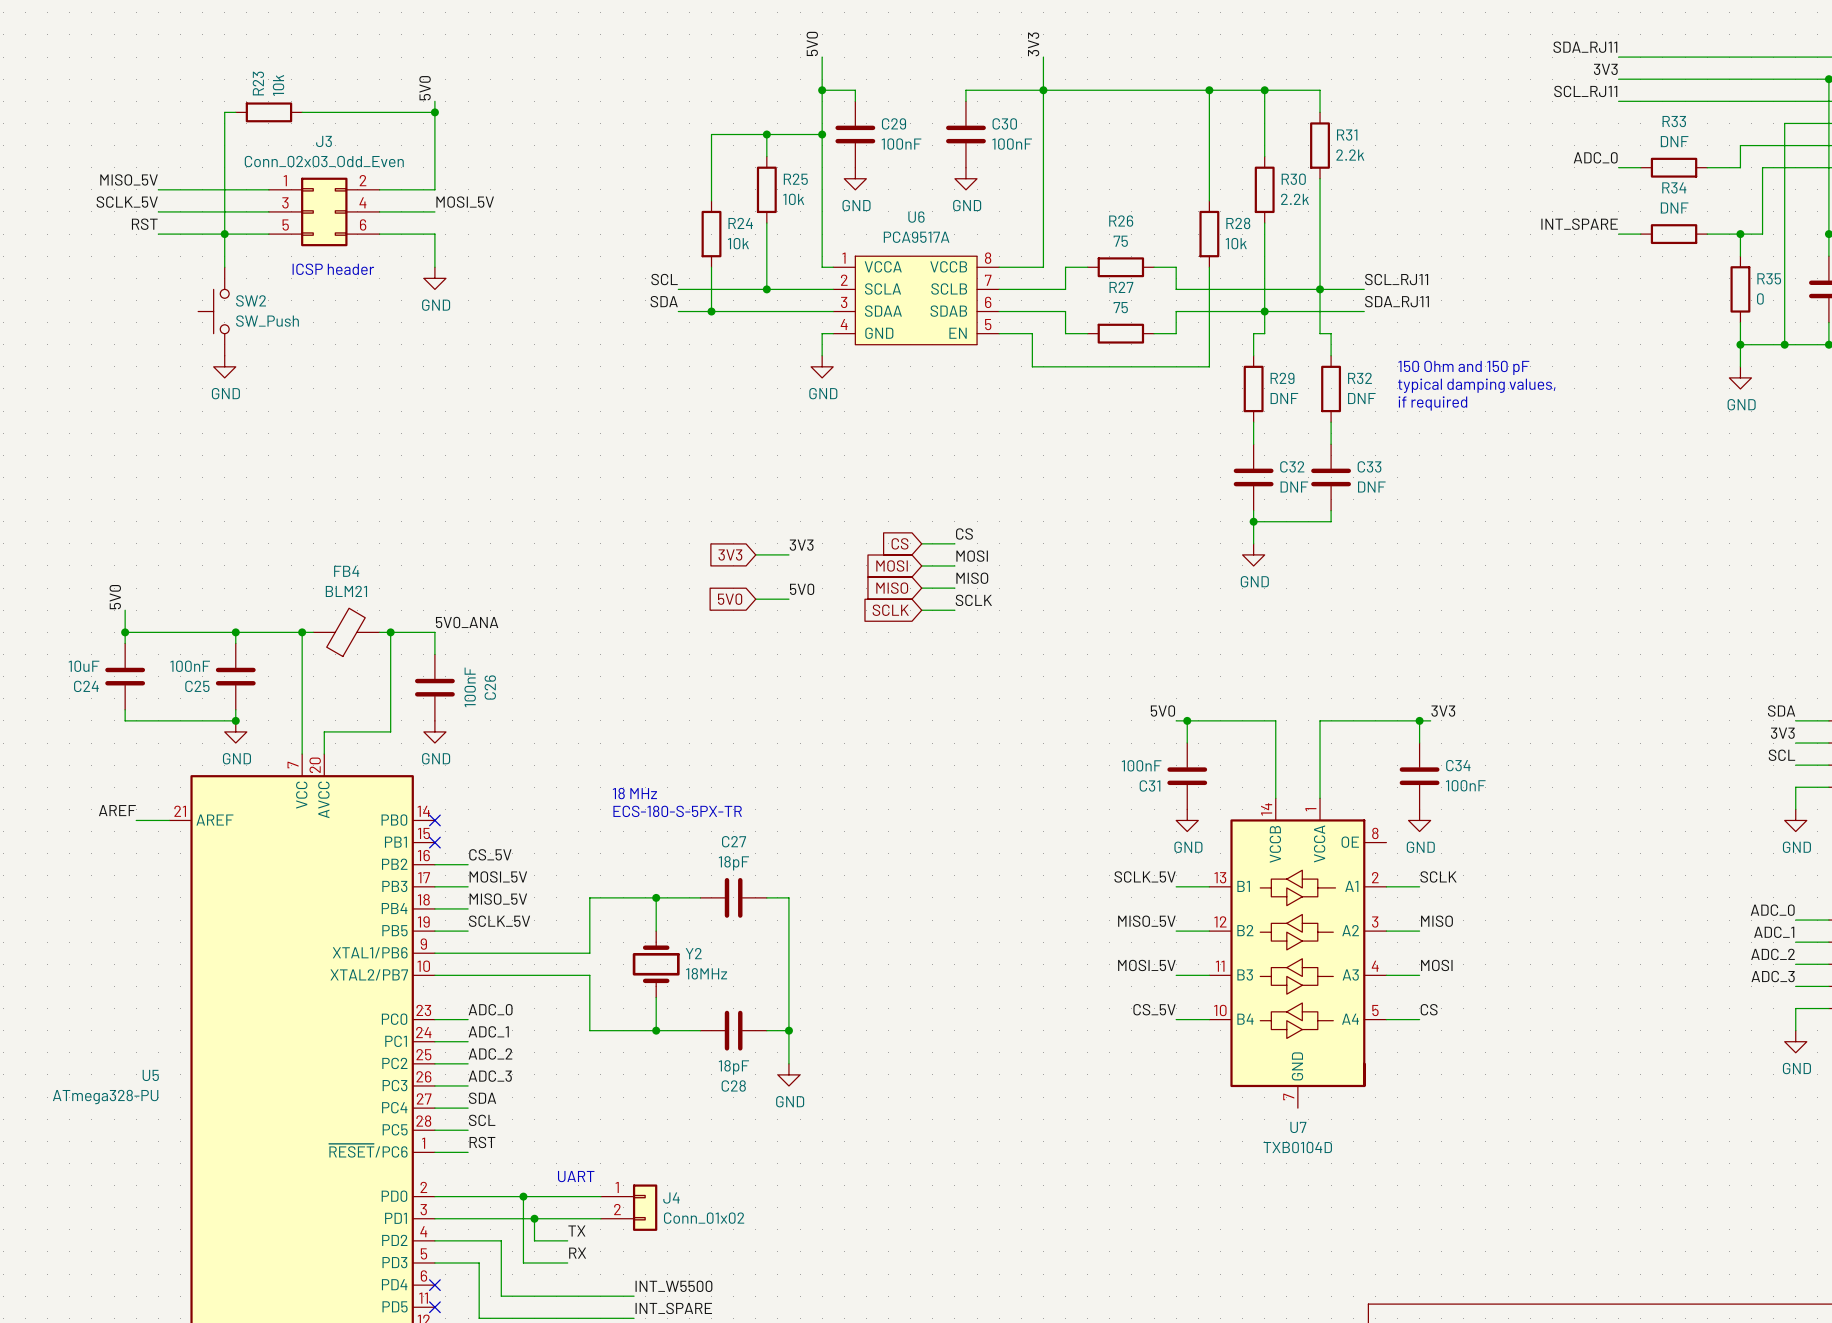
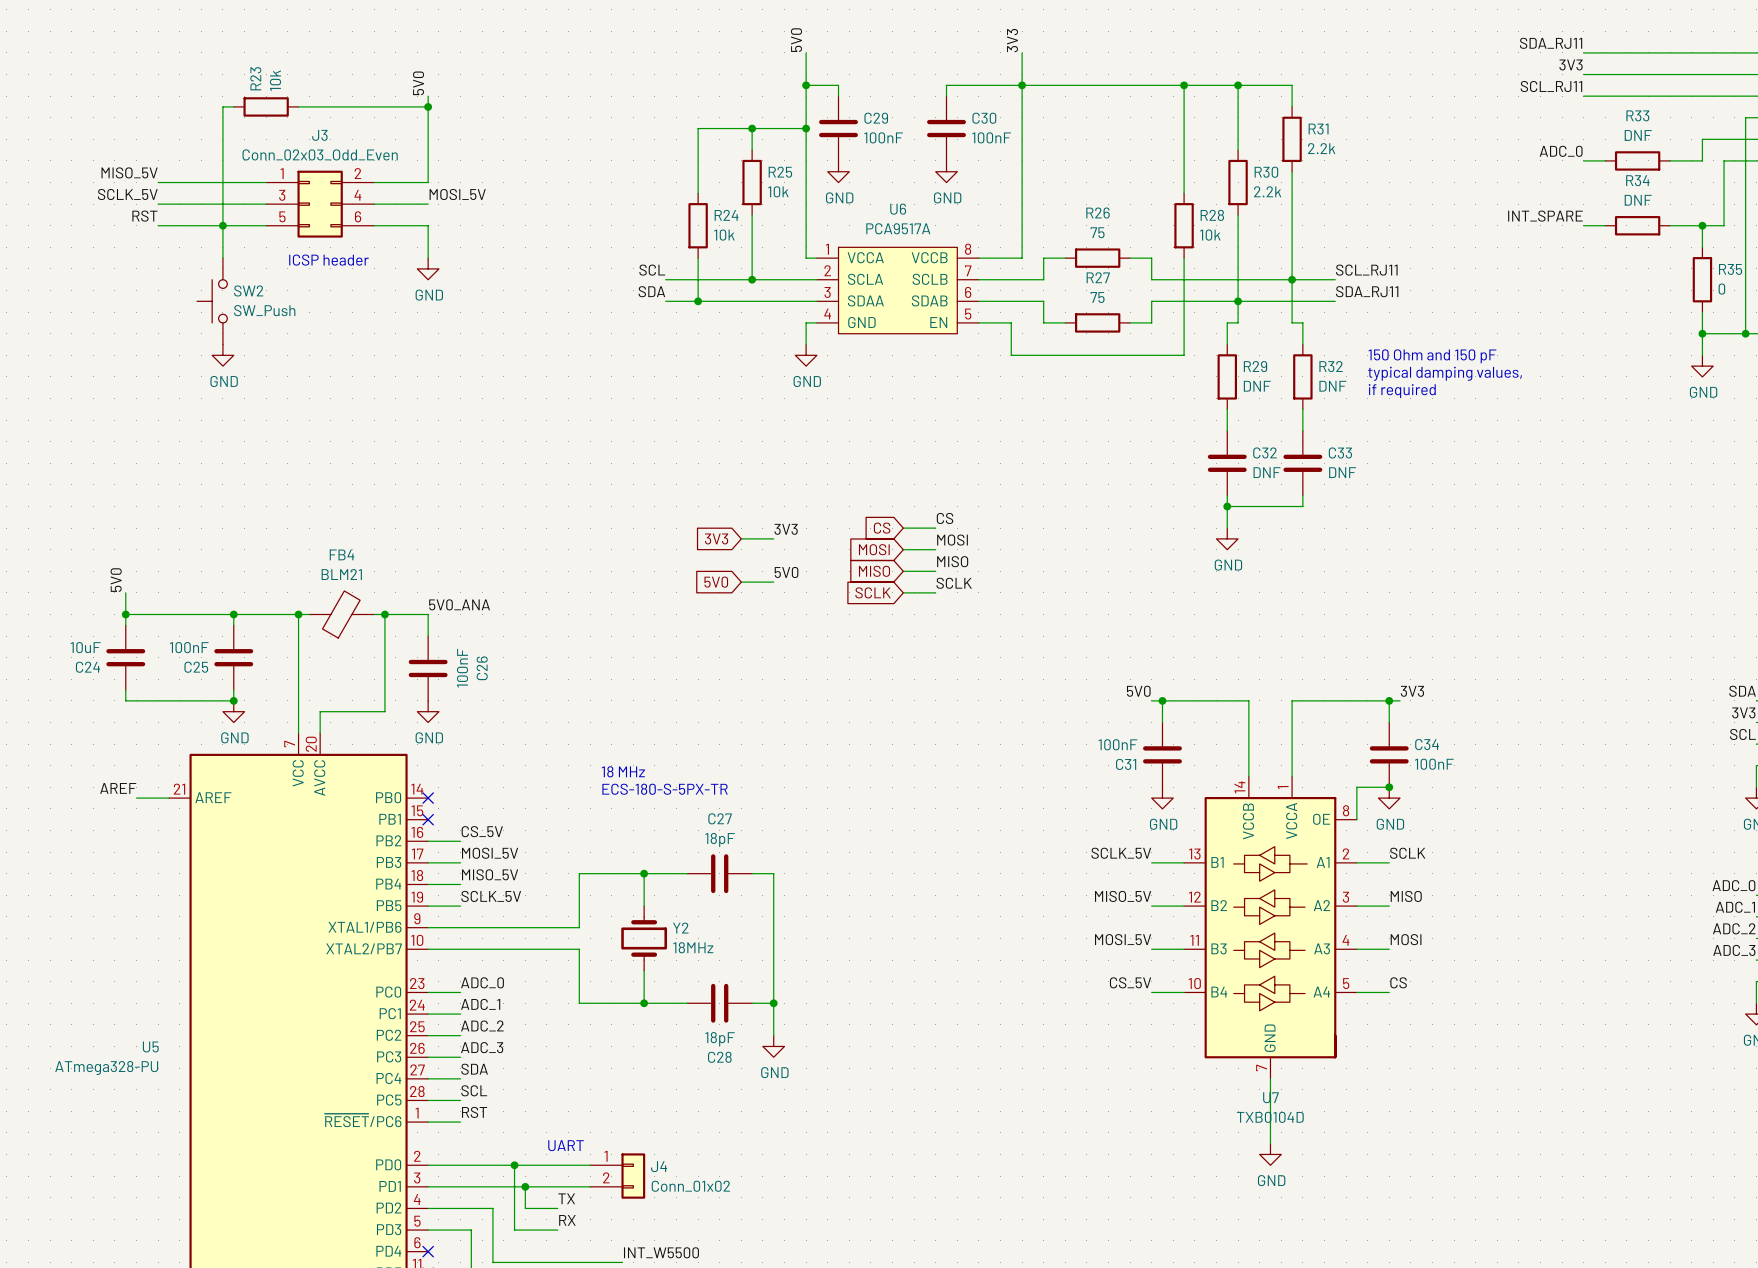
wire: none -> (1389, 787) (1356, 787) (1356, 819)
junction: none -> (1389, 787)
wire: none -> (1270, 1078) (1270, 1143)
power symbol: none -> GND (1270, 1154)

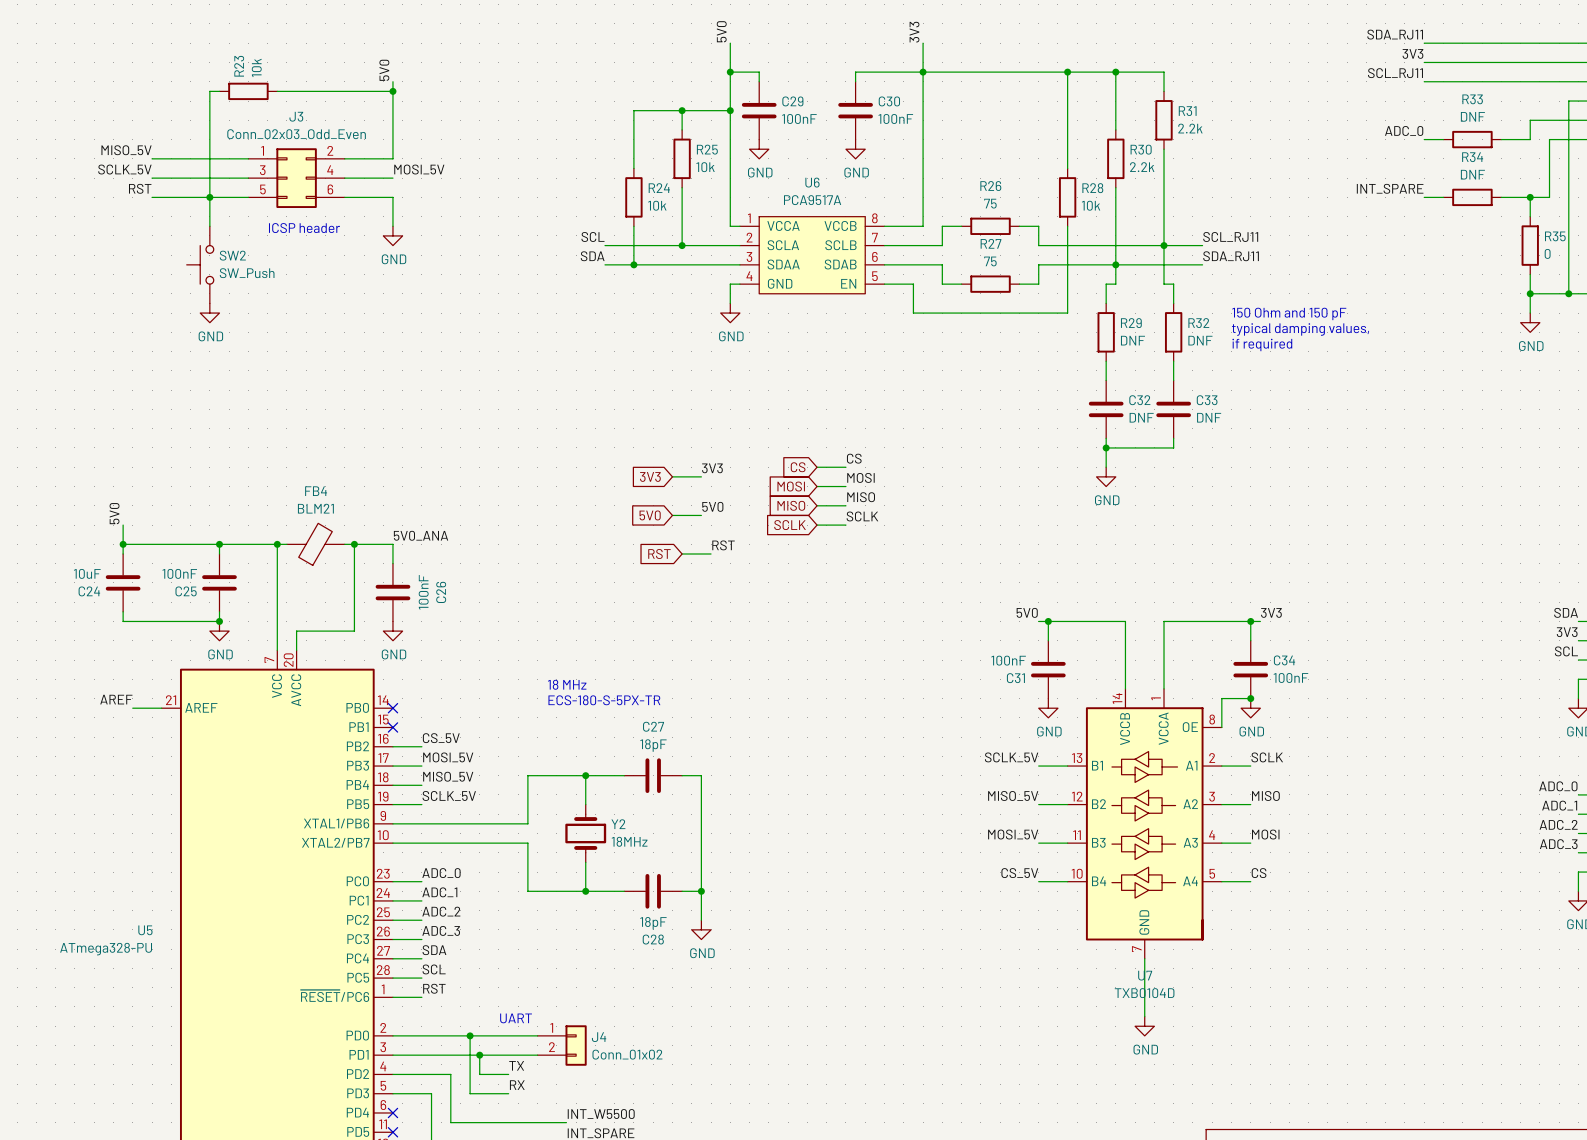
label: none -> RST (723, 545)
global label: none -> RST (659, 553)
wire: none -> (682, 553) (711, 553)

